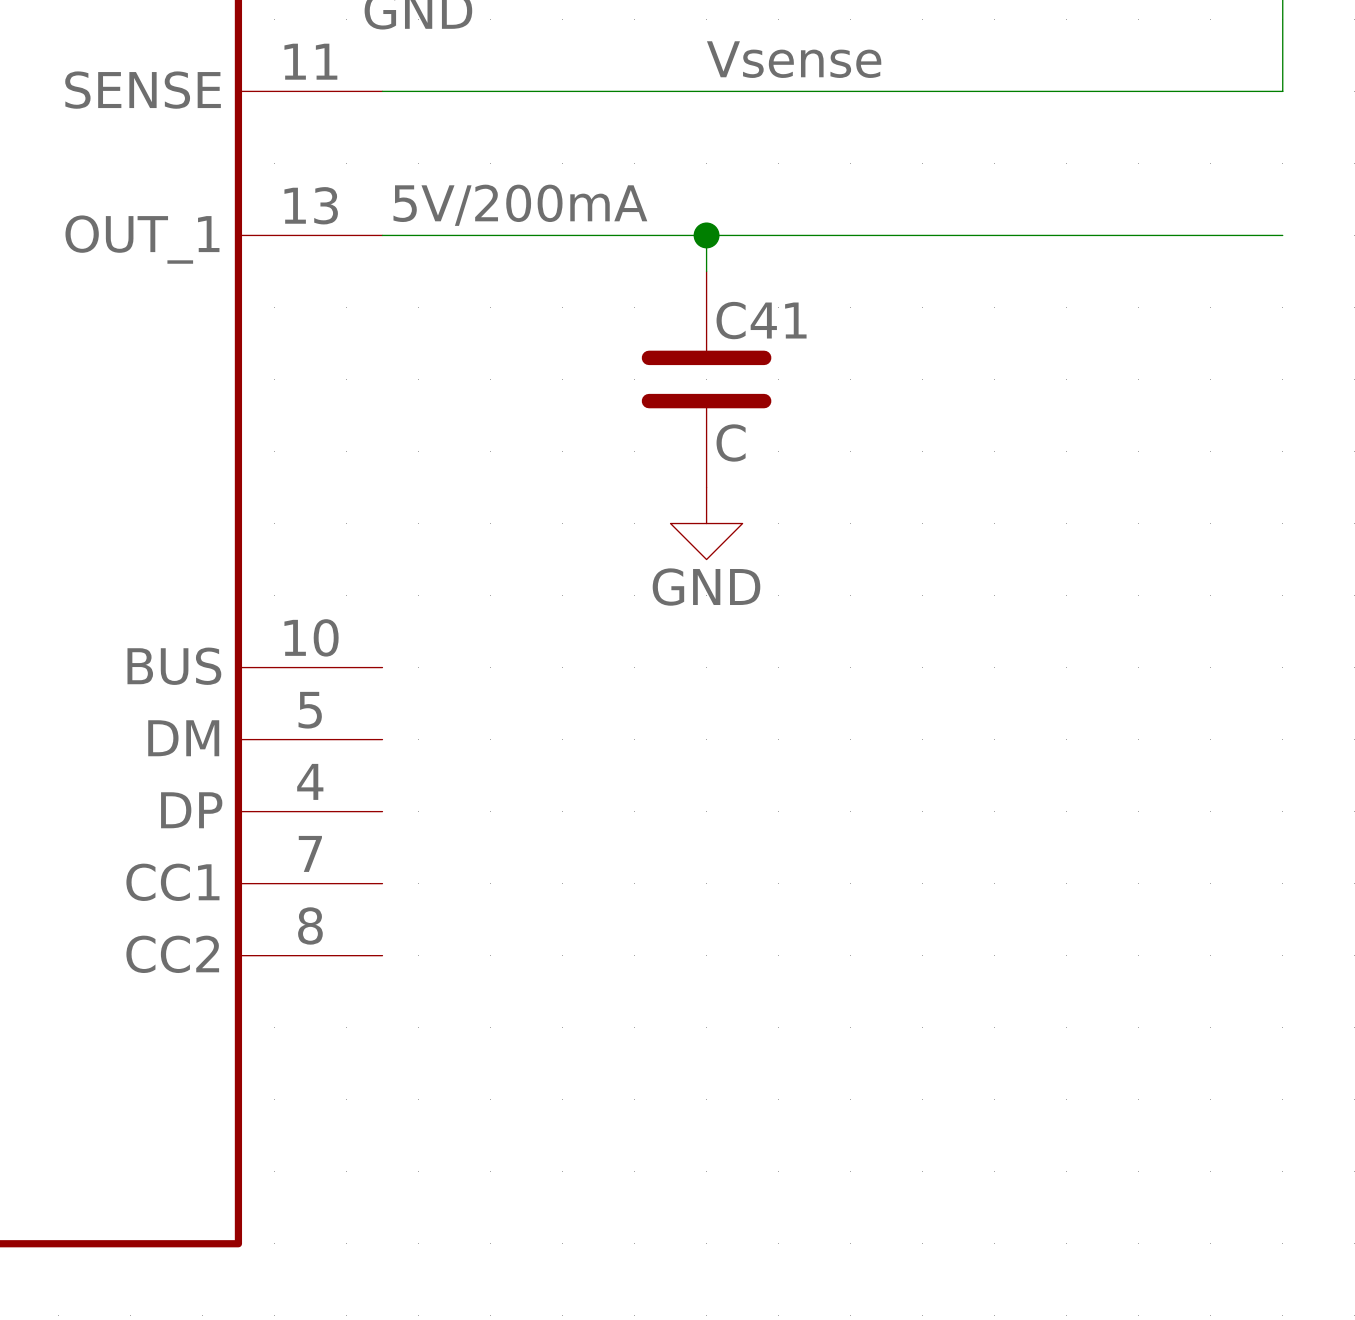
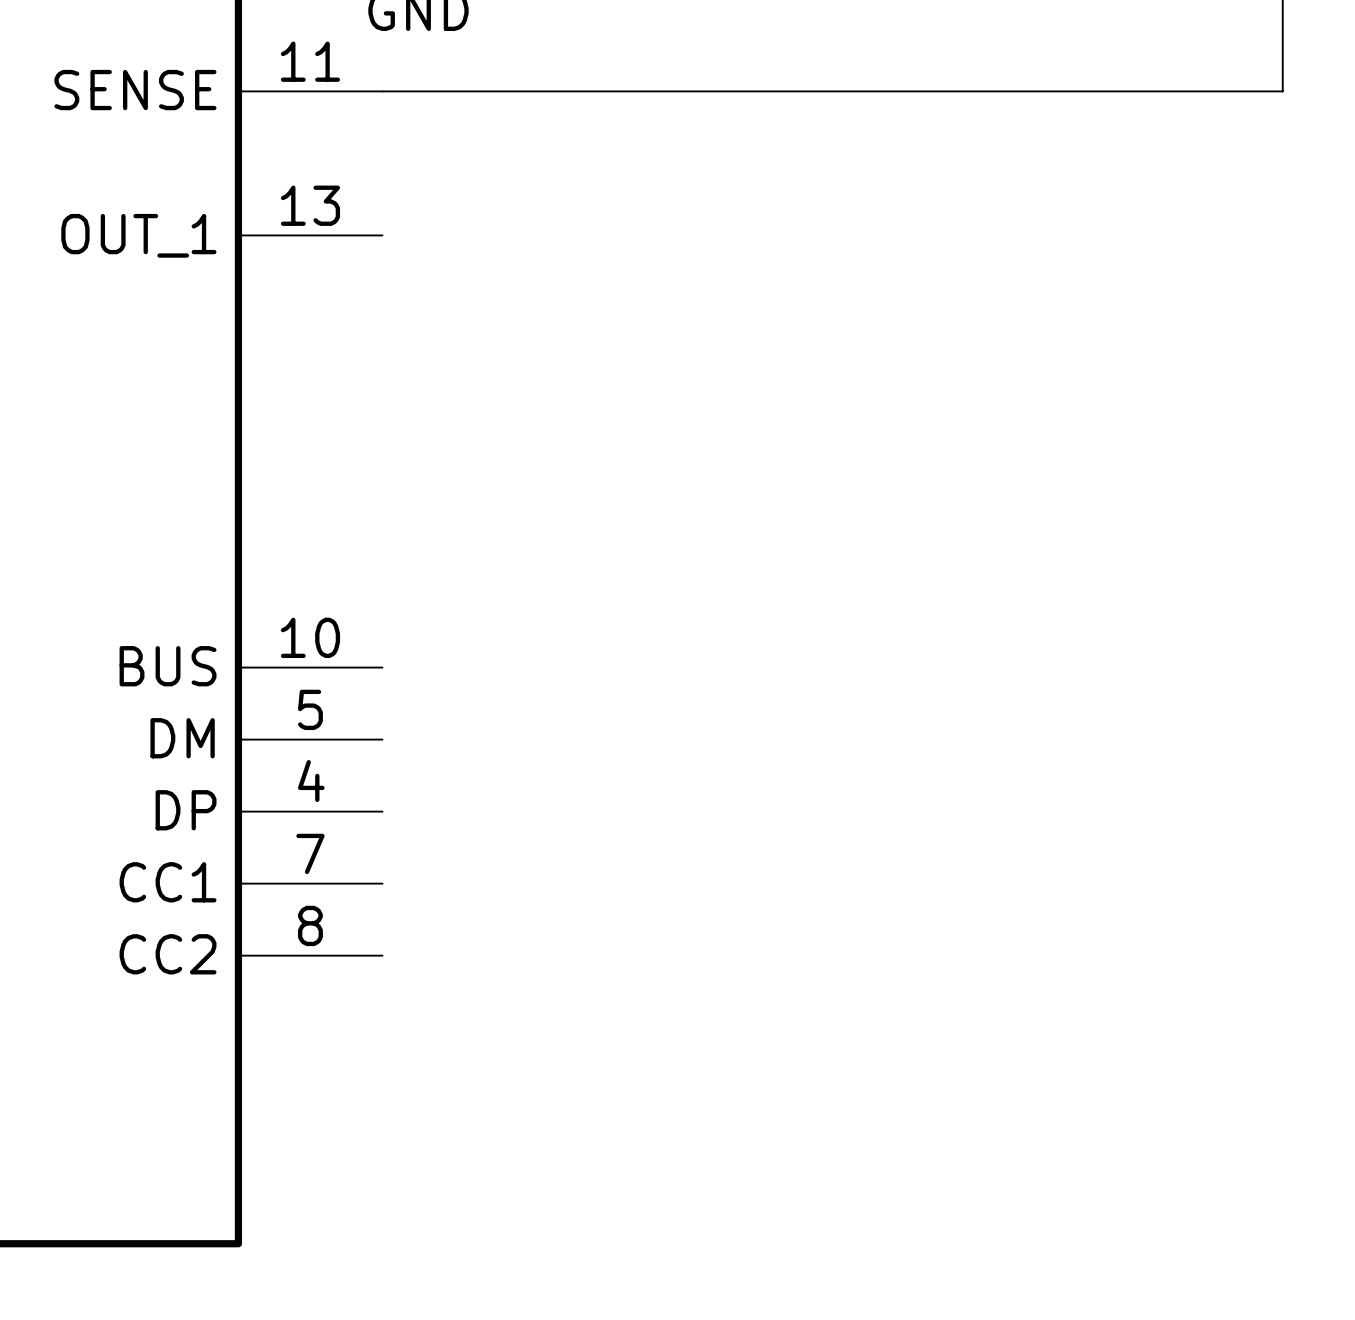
label: Vsense (794, 59) -> none
label: 5V/200mA (520, 205) -> none
wire: (382, 235) (1282, 235) -> none
wire: (706, 235) (706, 271) -> none
junction: (706, 235) -> none
C41: C (706, 379) -> none
power symbol: GND (706, 523) -> none

